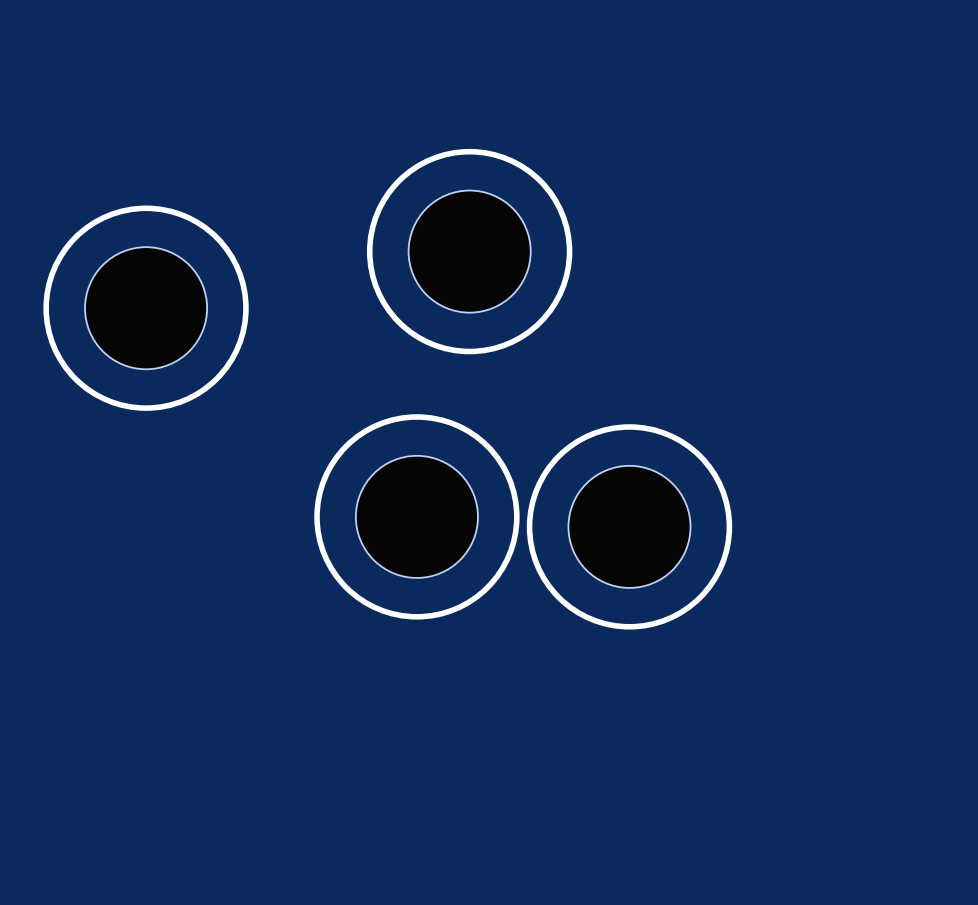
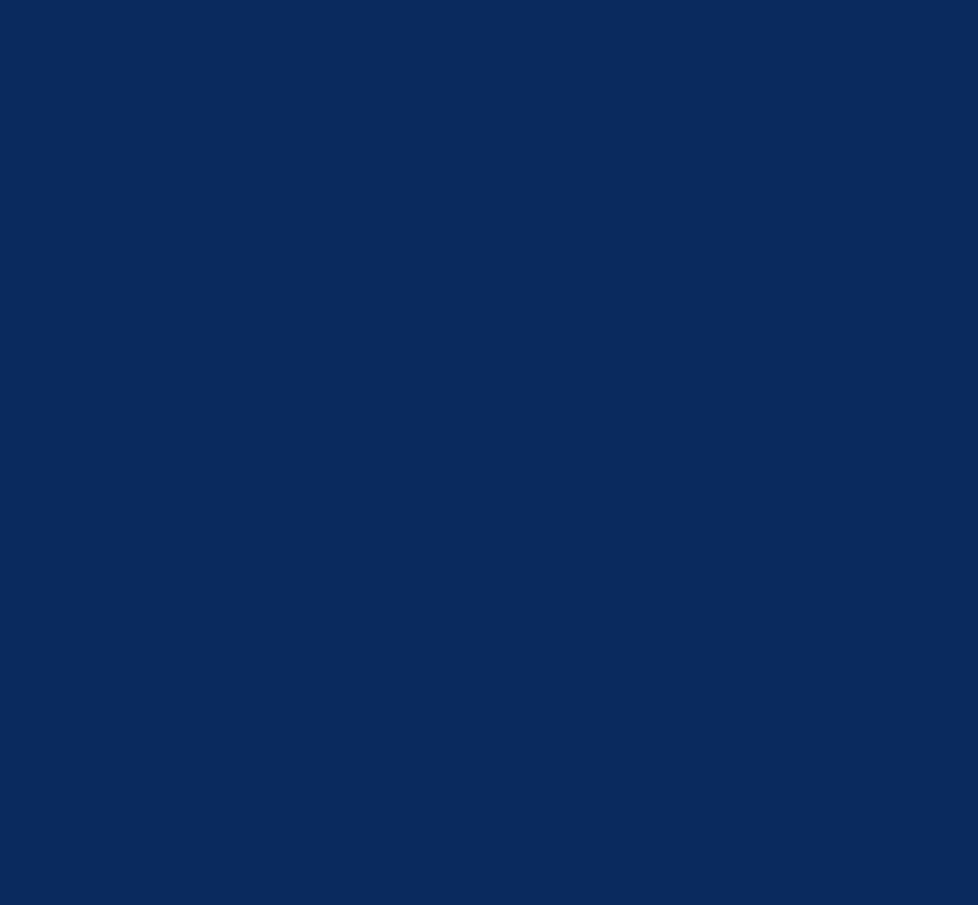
part: (469, 251) -> none
part: (146, 308) -> none
part: (416, 516) -> none
part: (629, 526) -> none

